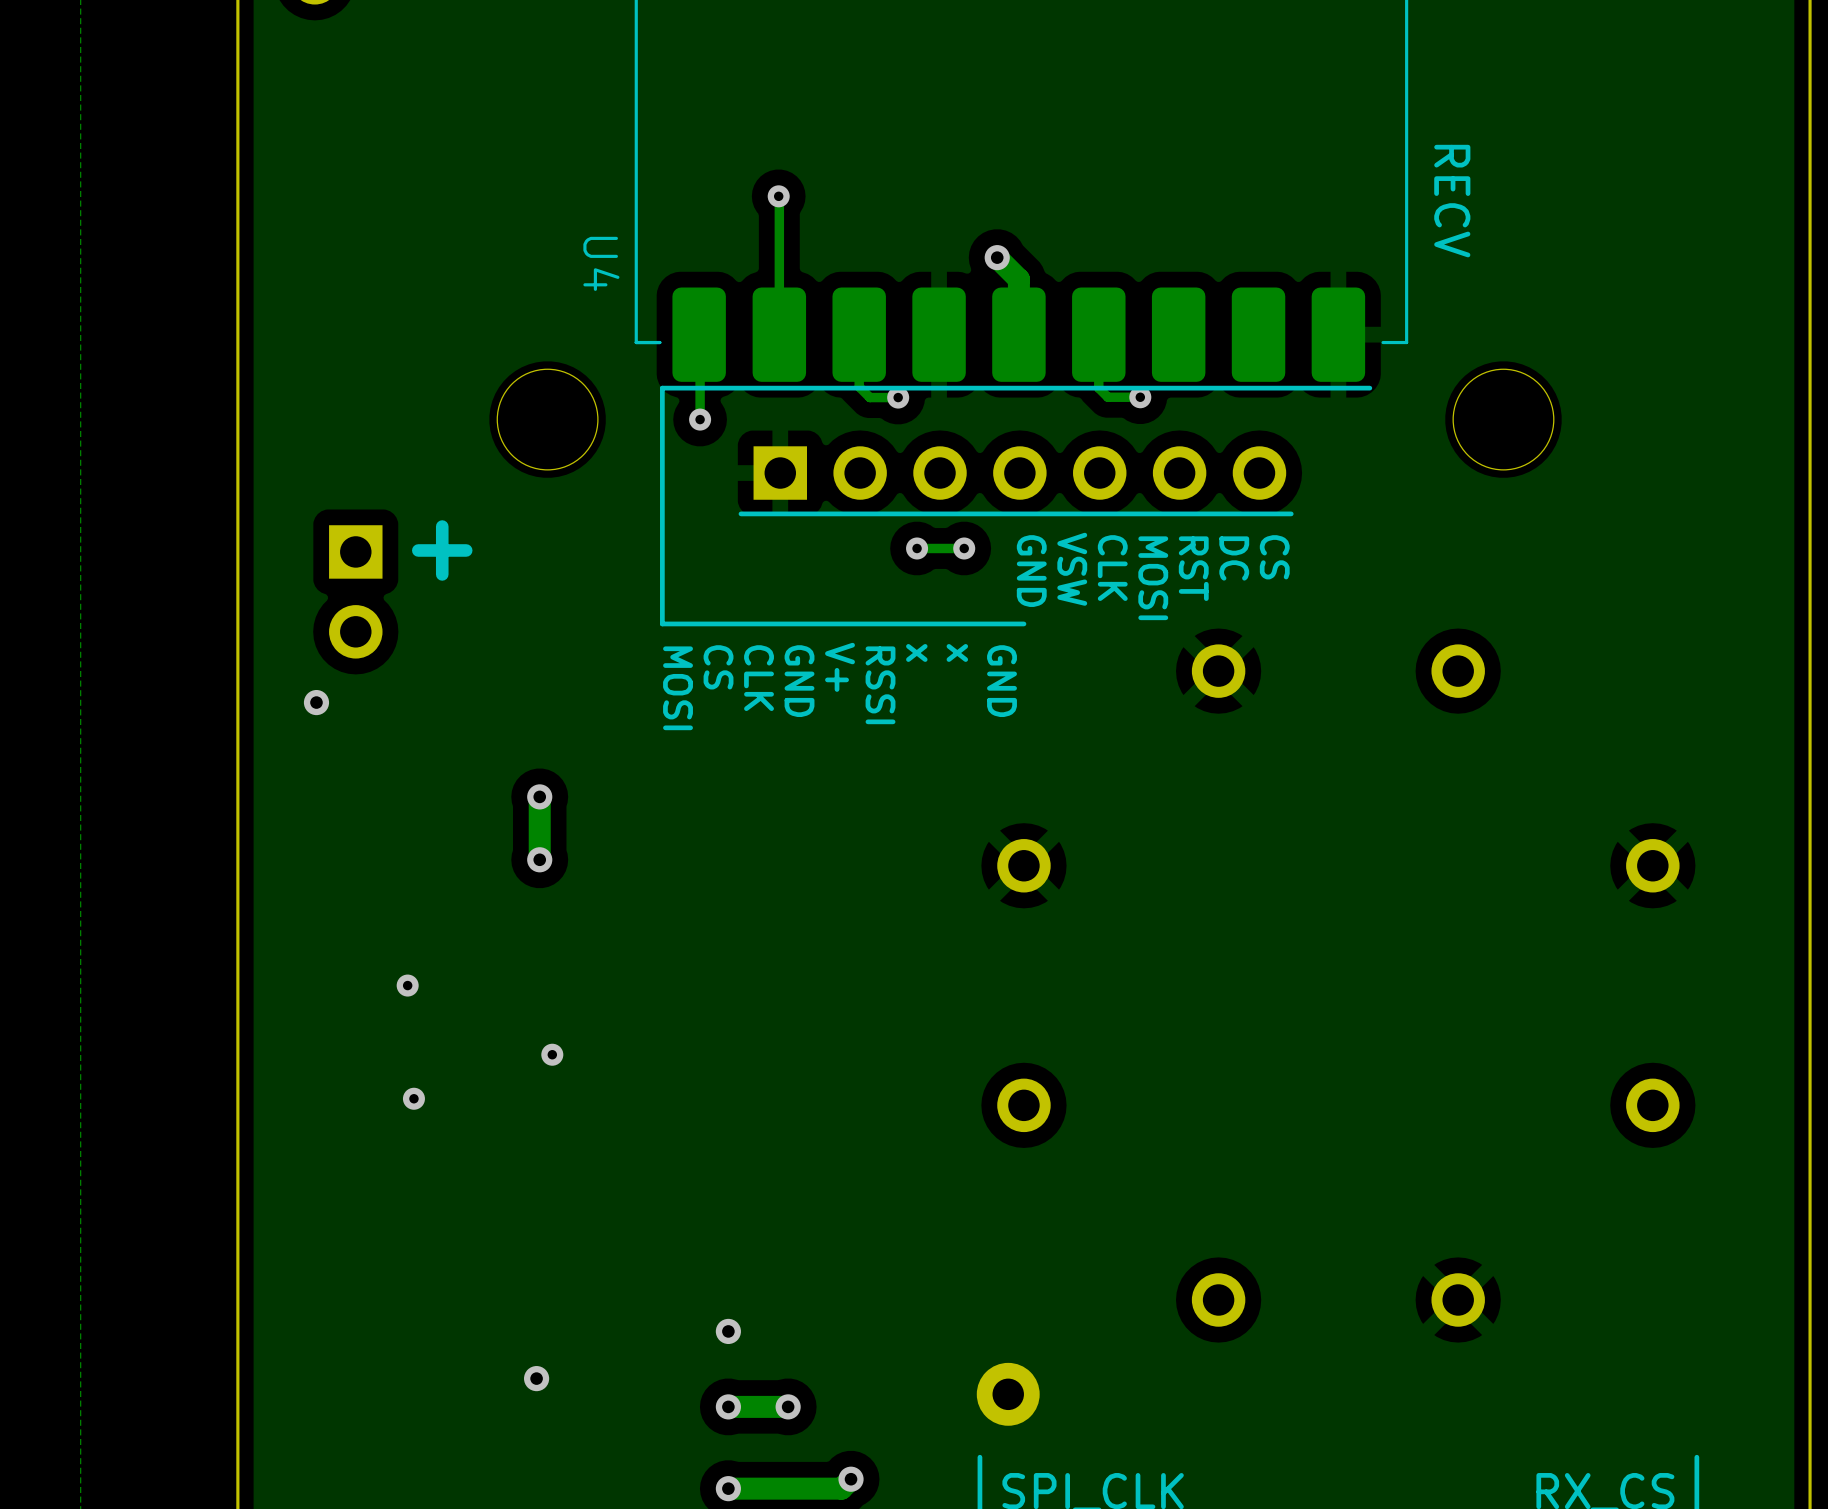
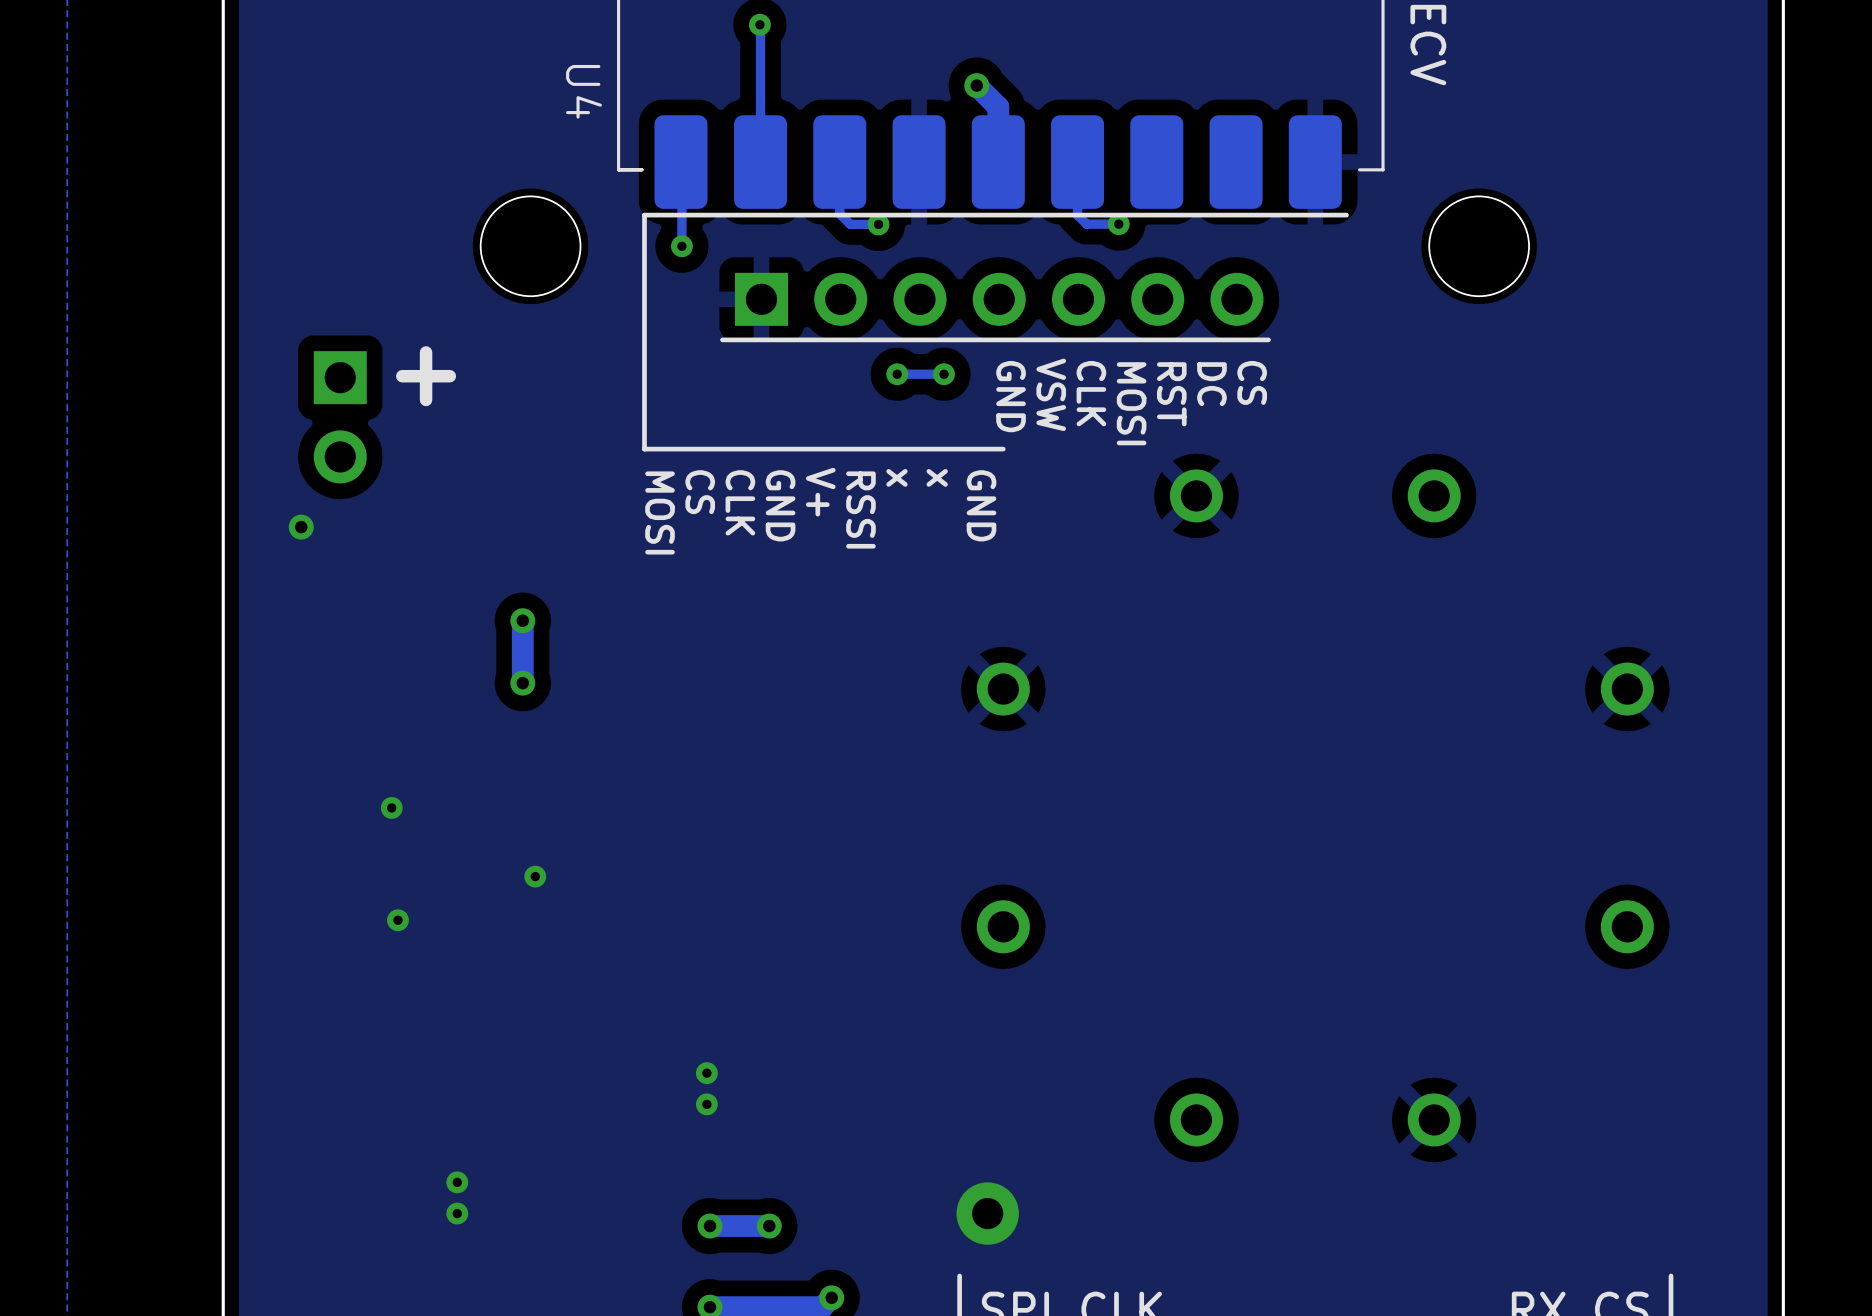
via: none -> (706, 1073)
via: none -> (706, 1104)
via: (728, 1331) -> none
via: none -> (457, 1182)
via: (536, 1378) -> none
via: none -> (457, 1213)

